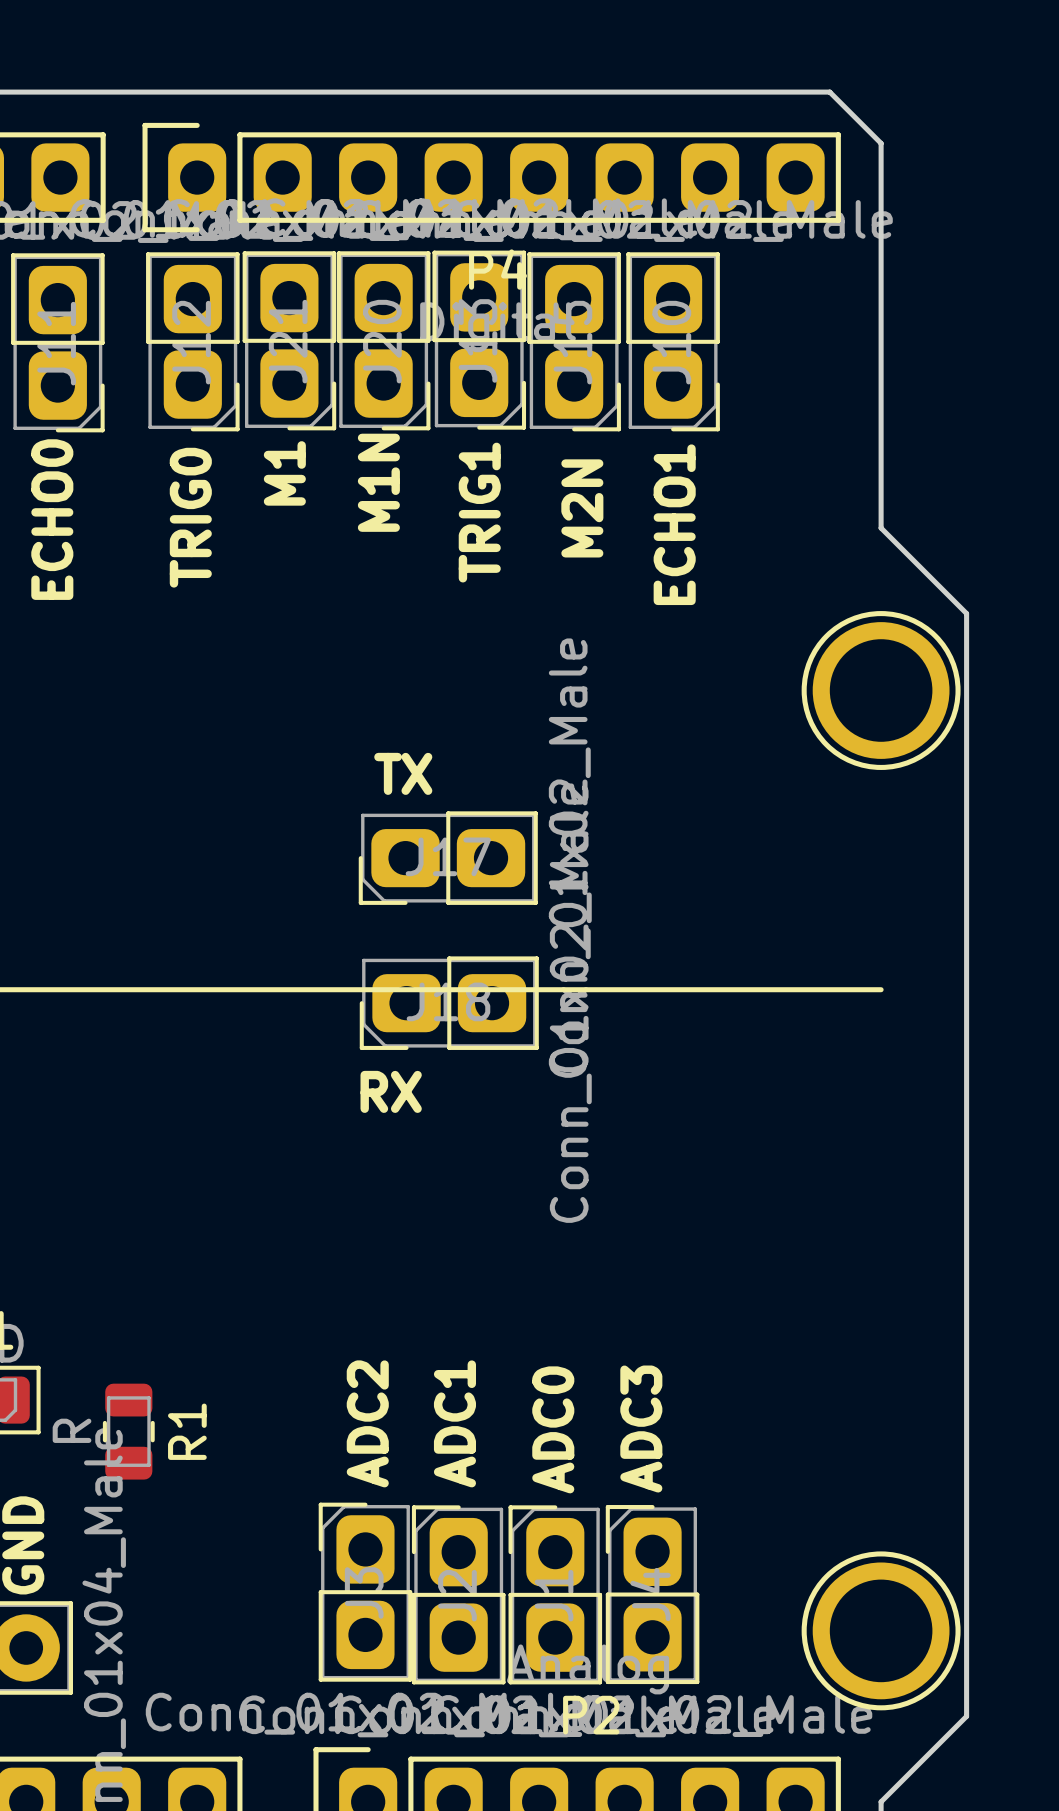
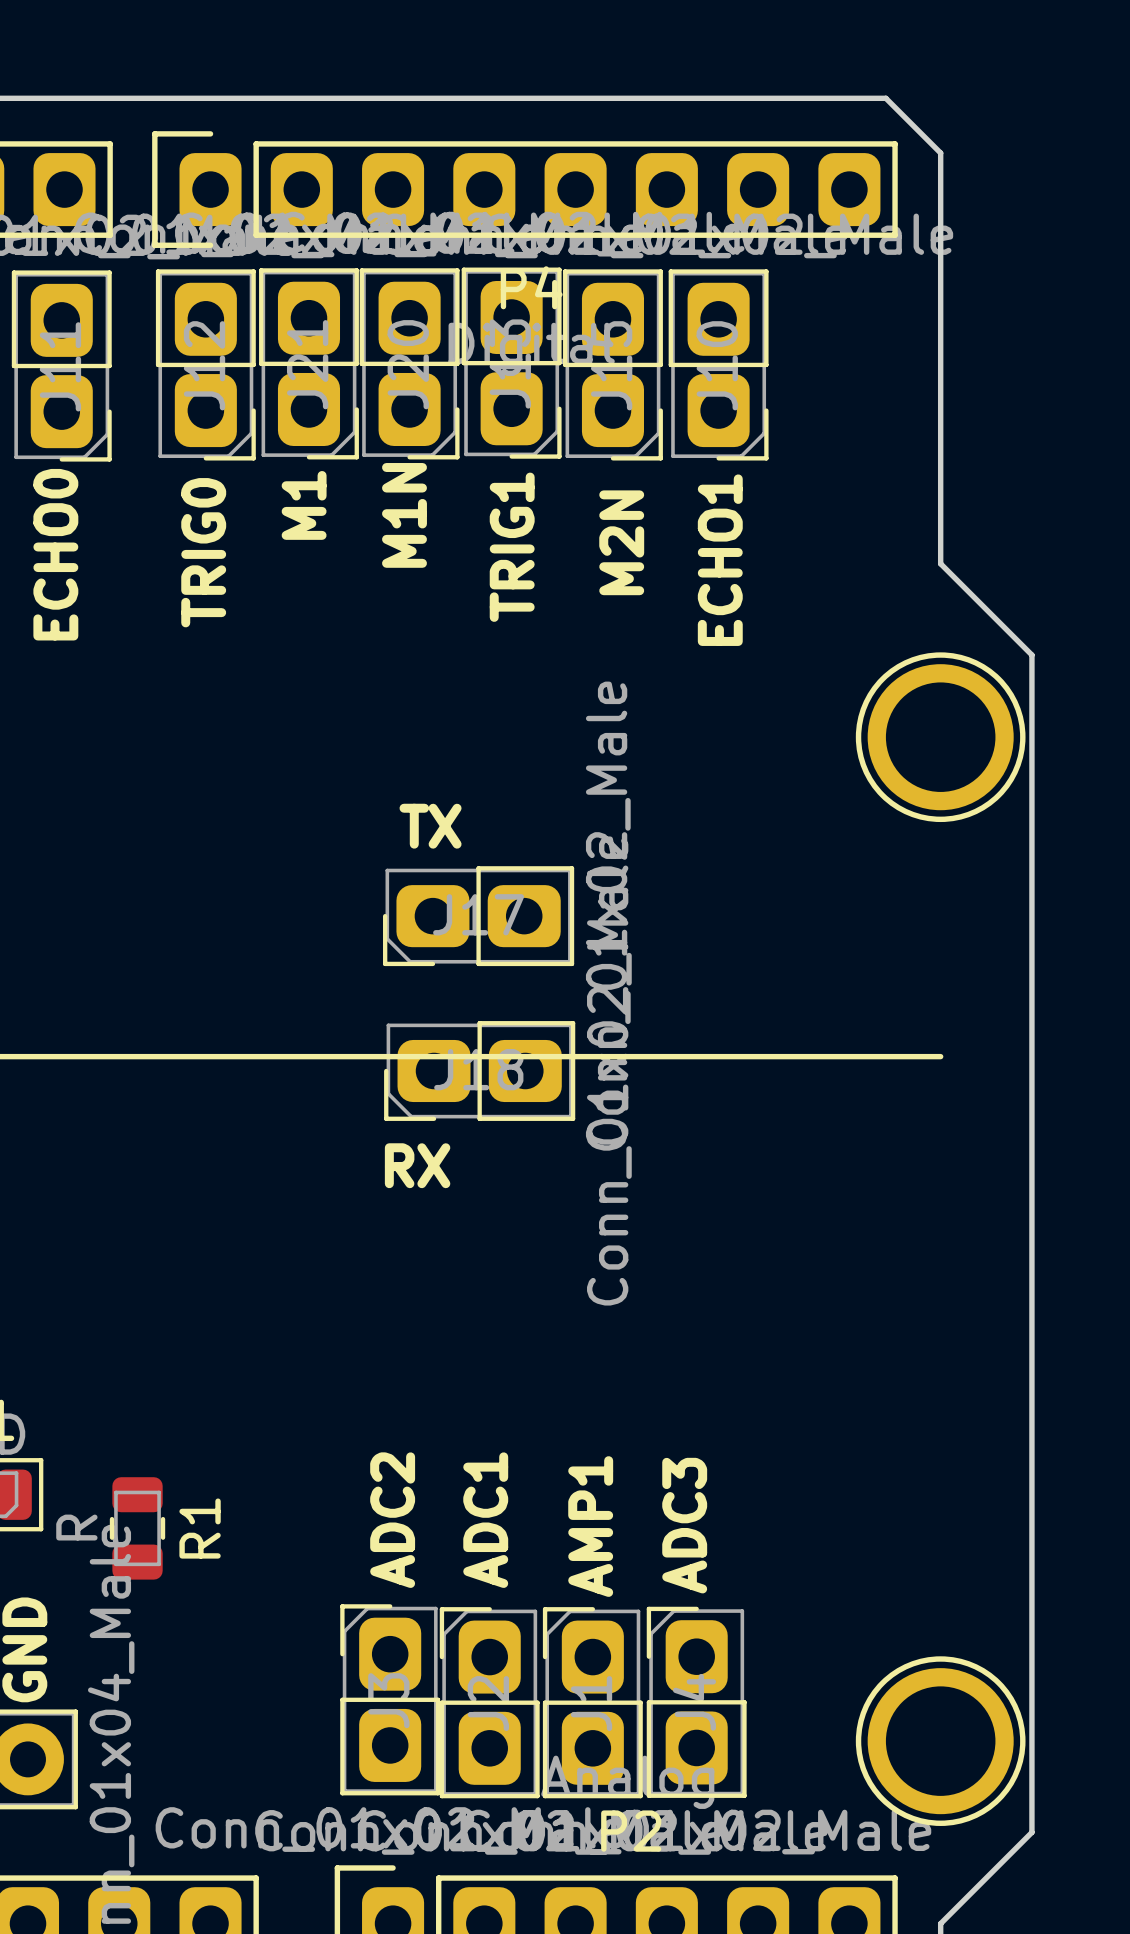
text: ADC0 (553, 1429) -> AMP1 (590, 1526)

